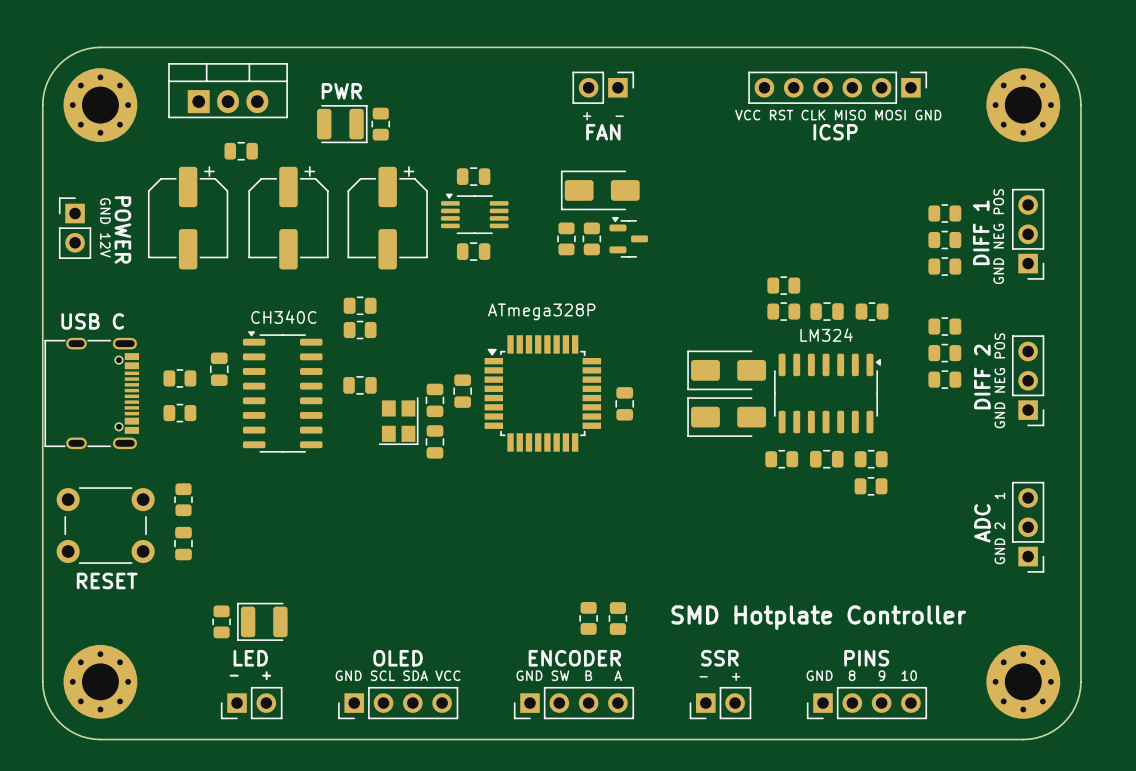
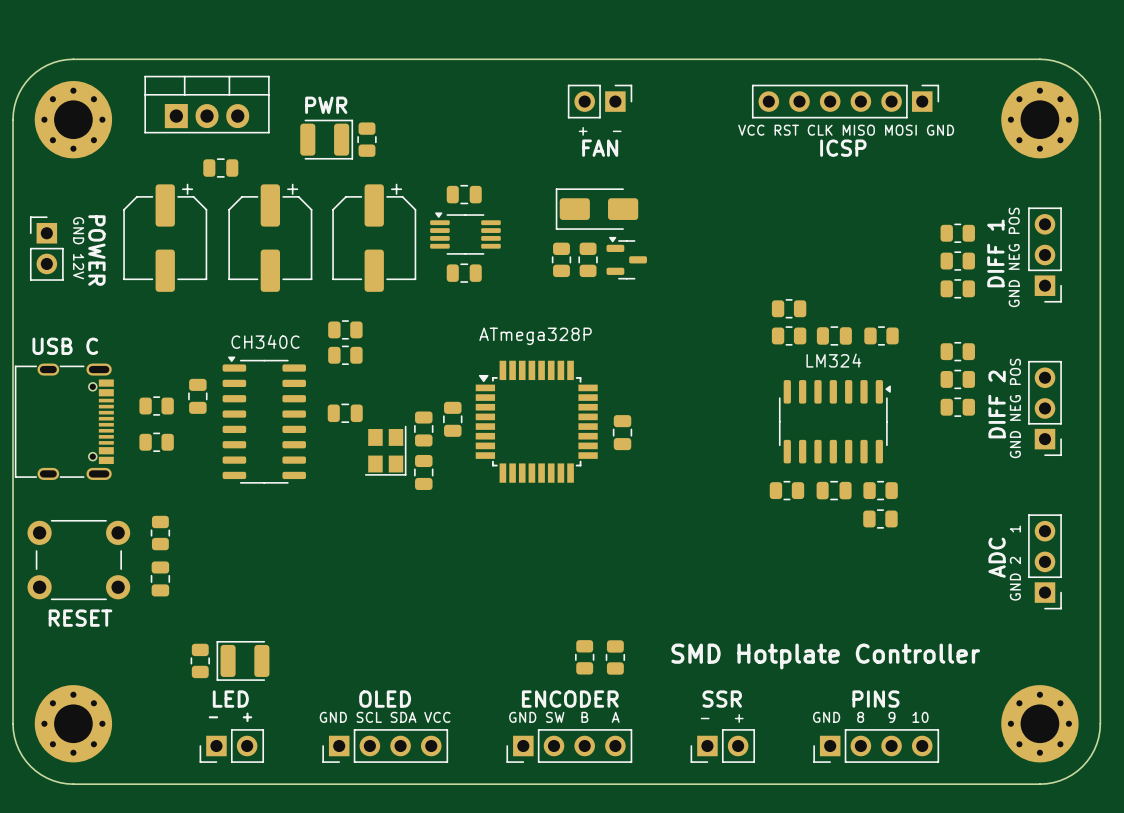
part: (726, 370) -> none
part: (726, 417) -> none

